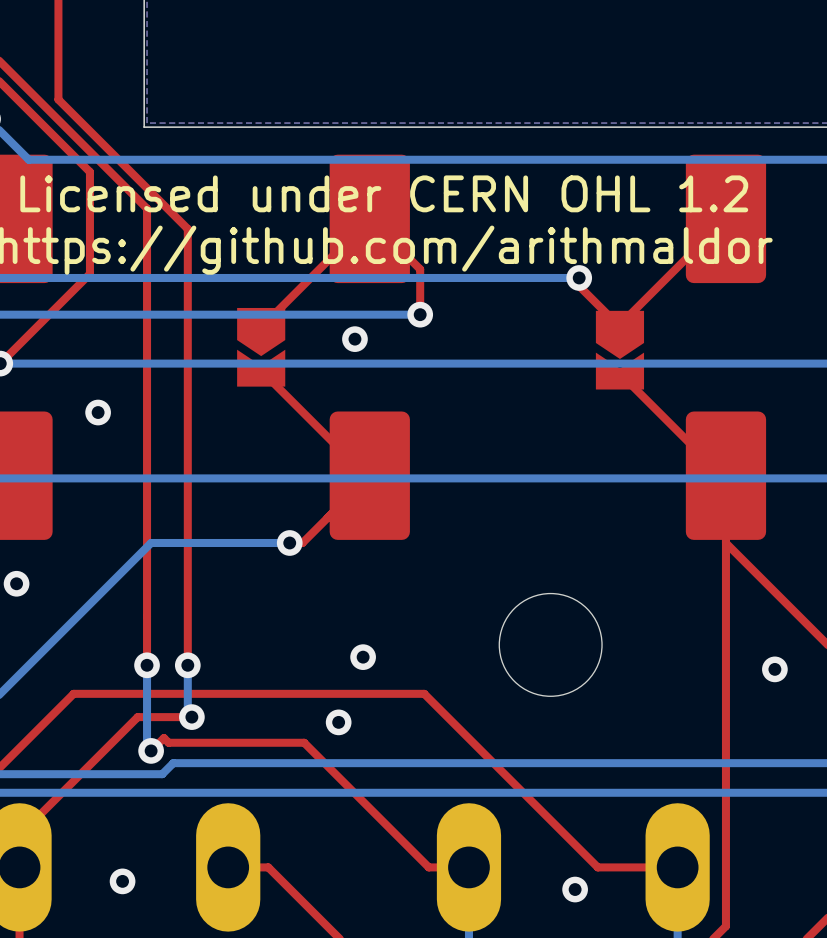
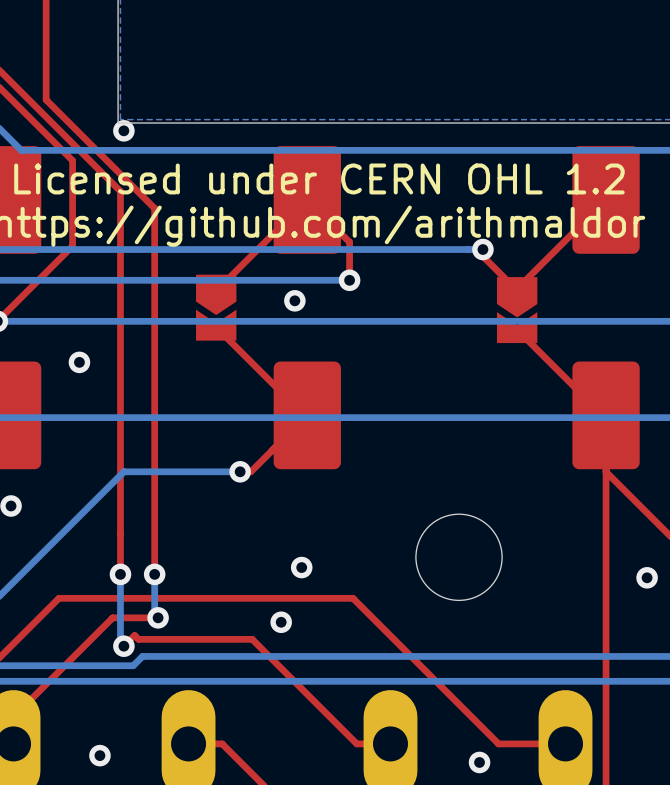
via: none -> (123, 130)

